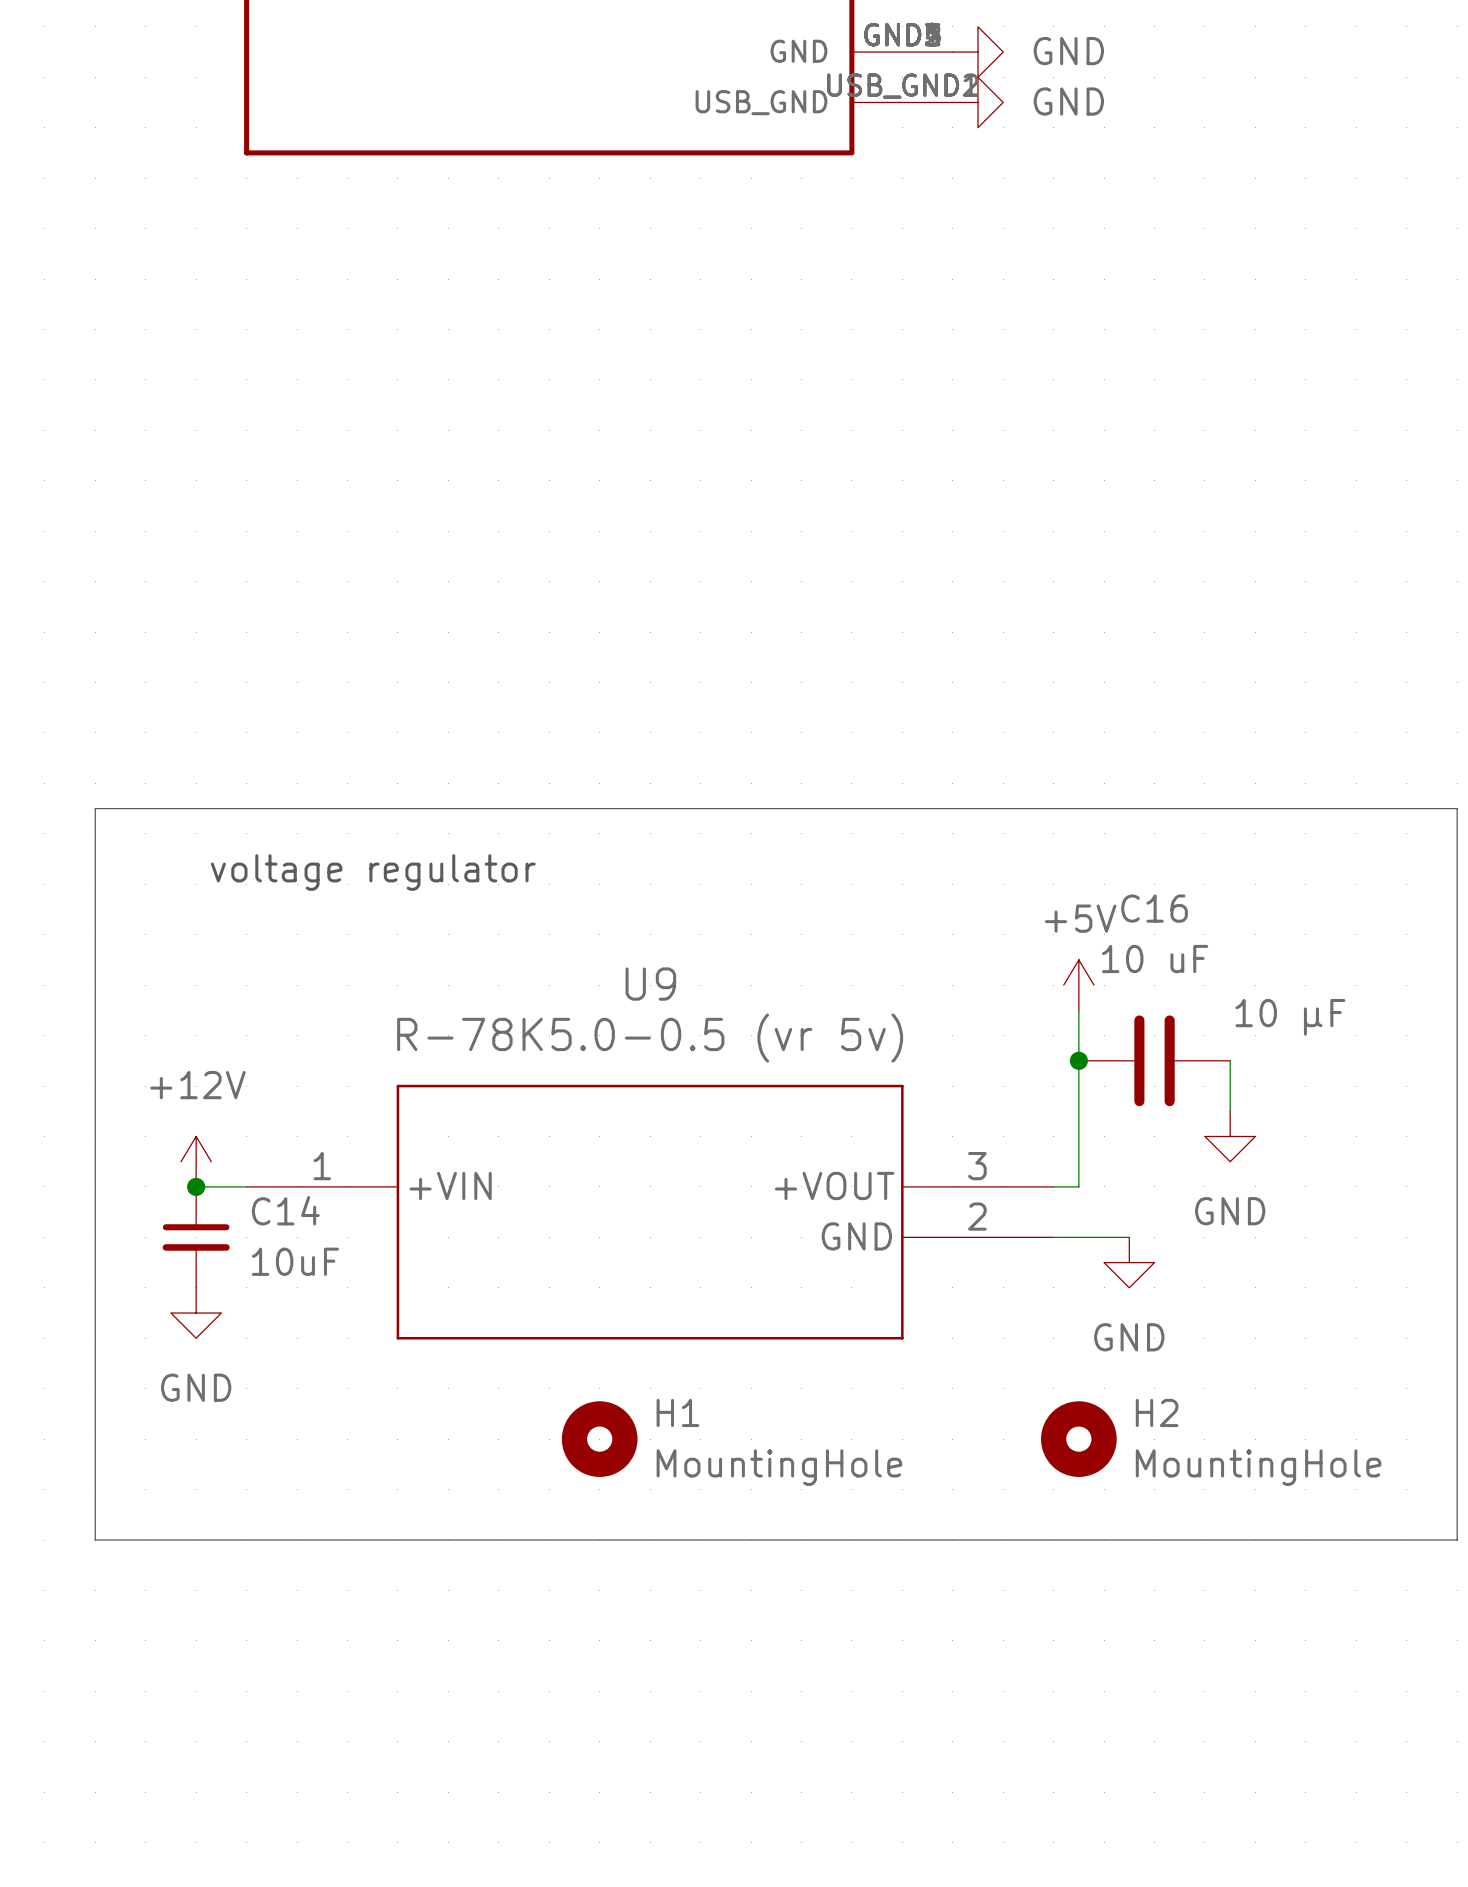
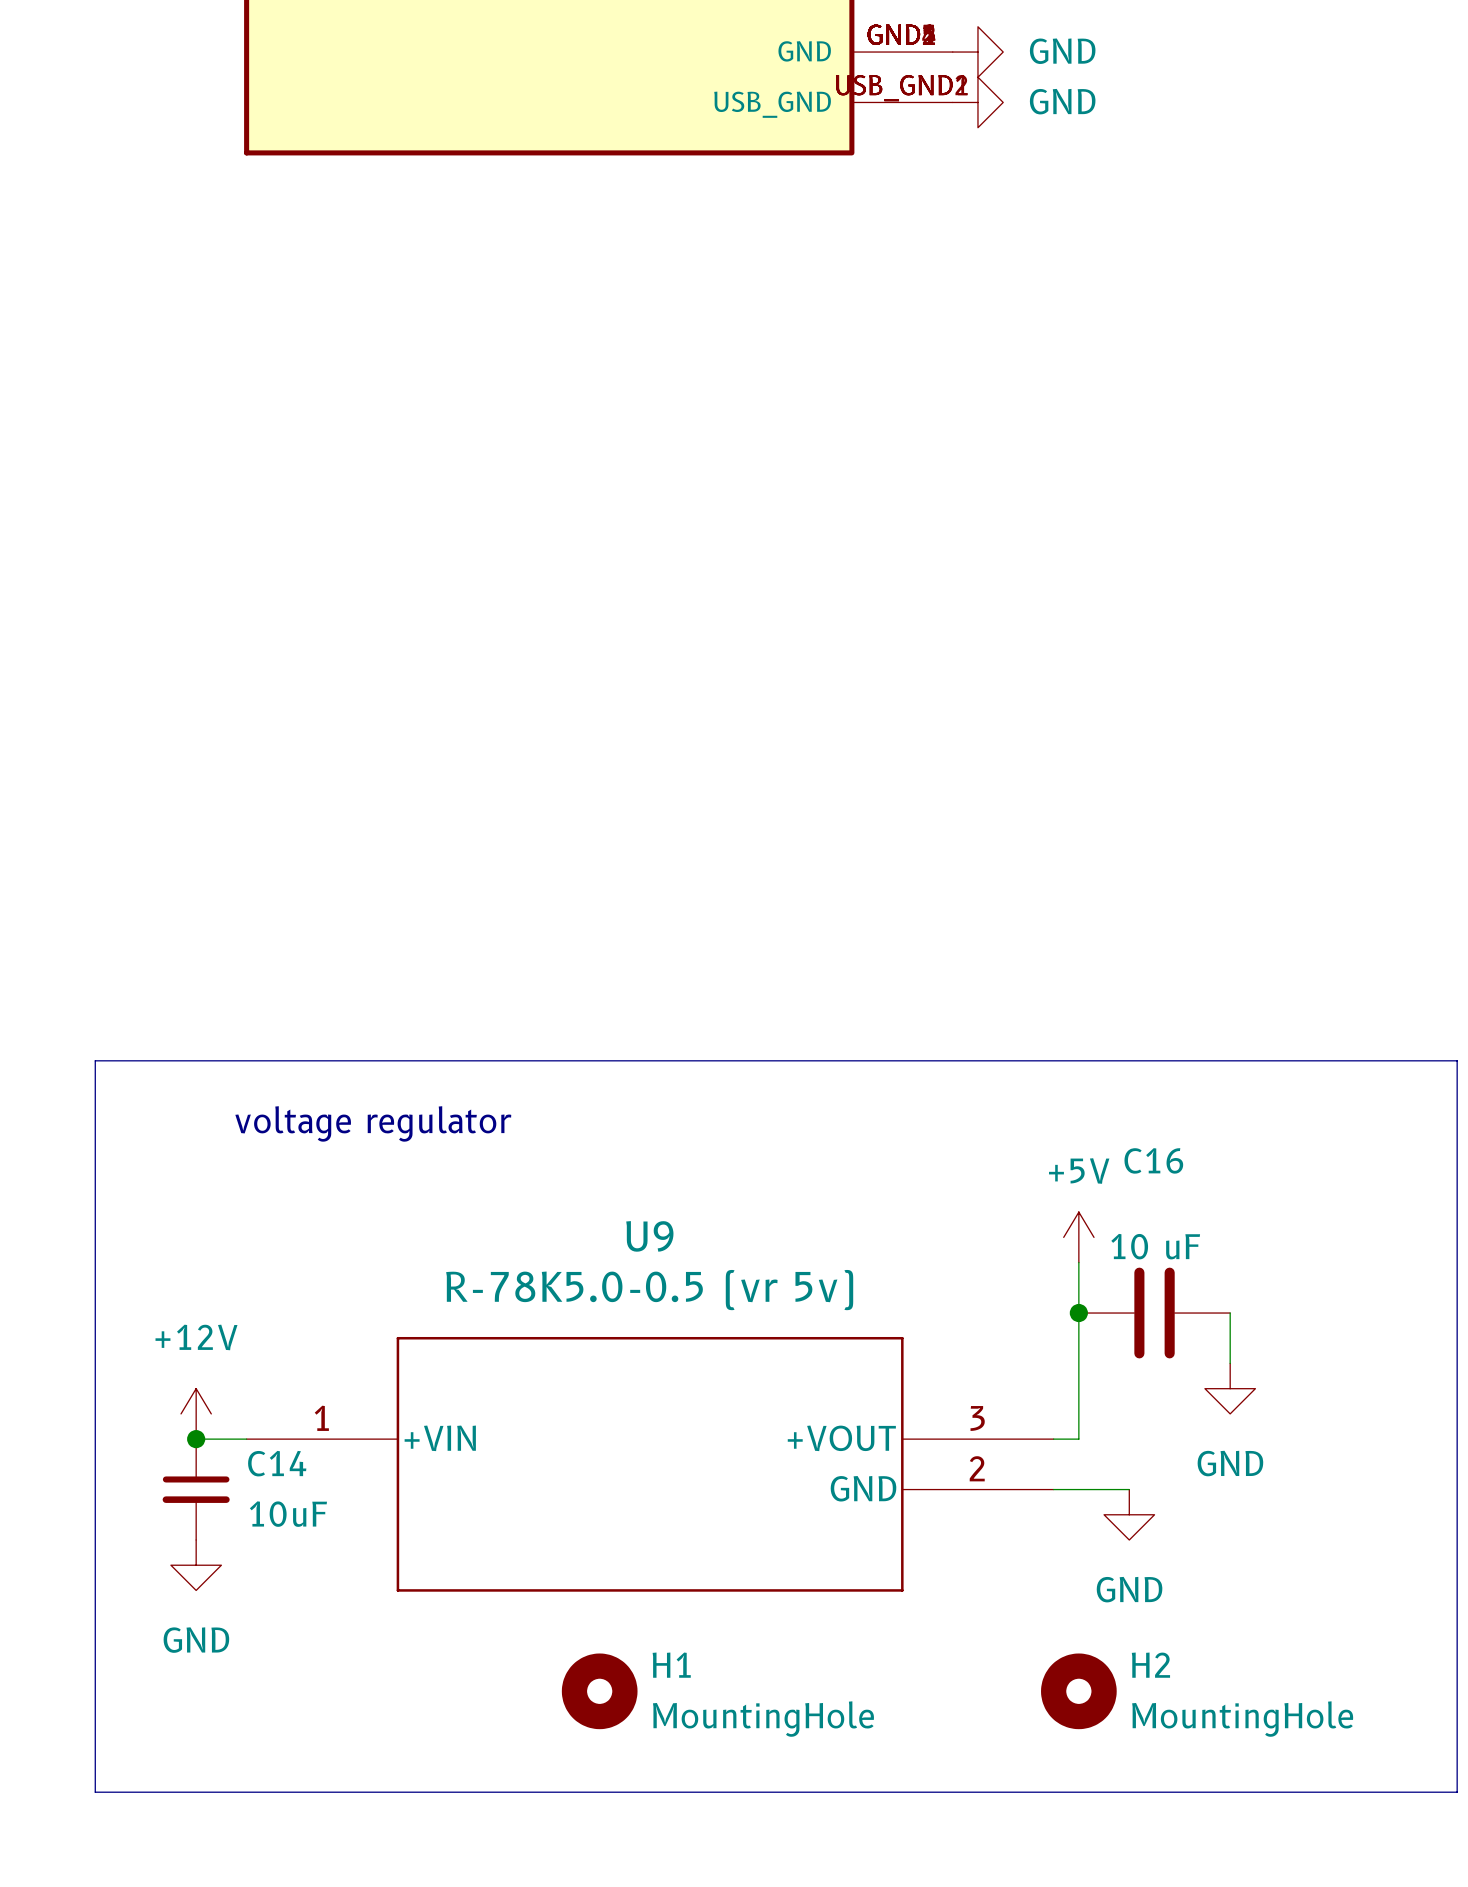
text position: voltage regulator (373, 872) -> voltage regulator (373, 1123)
C16 value position: 10 uF (1155, 959) -> 10 uF (1155, 1246)
power symbol position: +5V (1078, 985) -> +5V (1078, 1237)
wire: (1078, 1010) (1078, 1186) (1053, 1186) -> (1078, 1262) (1078, 1439) (1053, 1439)
label: 10 µF (1290, 1017) -> none
line: (95, 1060) (95, 808) (1457, 808) (1457, 1060) -> (95, 1060) (1457, 1060)
junction: (1078, 1060) -> none
C16 position: (1154, 1060) -> (1154, 1313)
wire: (1230, 1060) (1230, 1111) -> (1230, 1313) (1230, 1363)
power symbol: GND (1230, 1136) -> none
power symbol position: +12V (196, 1161) -> +12V (196, 1413)
wire: (196, 1186) (246, 1186) -> (196, 1439) (246, 1439)
junction: (196, 1186) -> none
U9 position: (650, 1212) -> (650, 1464)
C14 position: (196, 1237) -> (196, 1489)
wire: (1053, 1237) (1129, 1237) -> (1053, 1489) (1129, 1489)
power symbol: GND (1129, 1262) -> none
power symbol position: GND (196, 1313) -> GND (196, 1565)
junction: none -> (1078, 1313)
power symbol: none -> GND (1230, 1388)
junction: none -> (196, 1439)
H1 position: (599, 1439) -> (599, 1691)
H2 position: (1078, 1439) -> (1078, 1691)
power symbol: none -> GND (1129, 1514)
line: (95, 1540) (1457, 1540) -> (95, 1540) (95, 1792) (1457, 1792) (1457, 1540)

